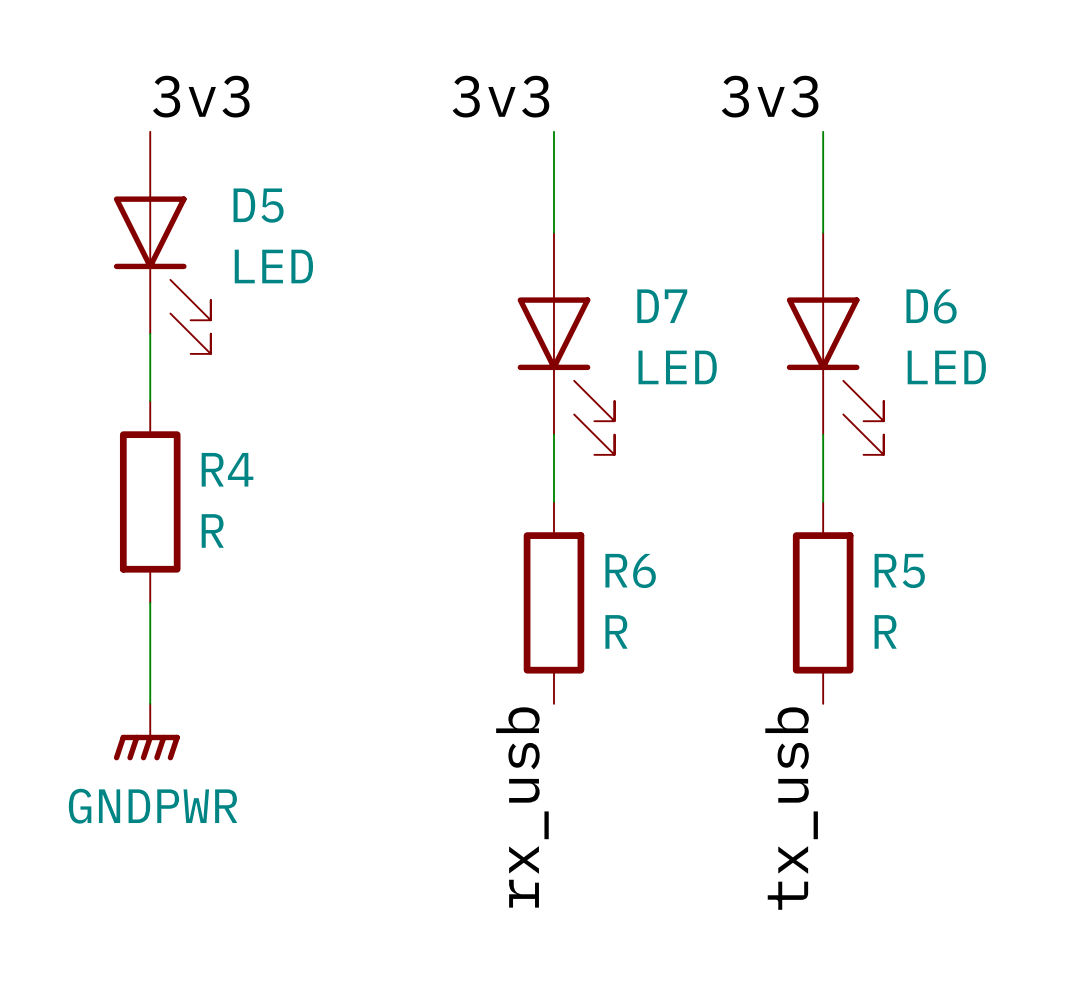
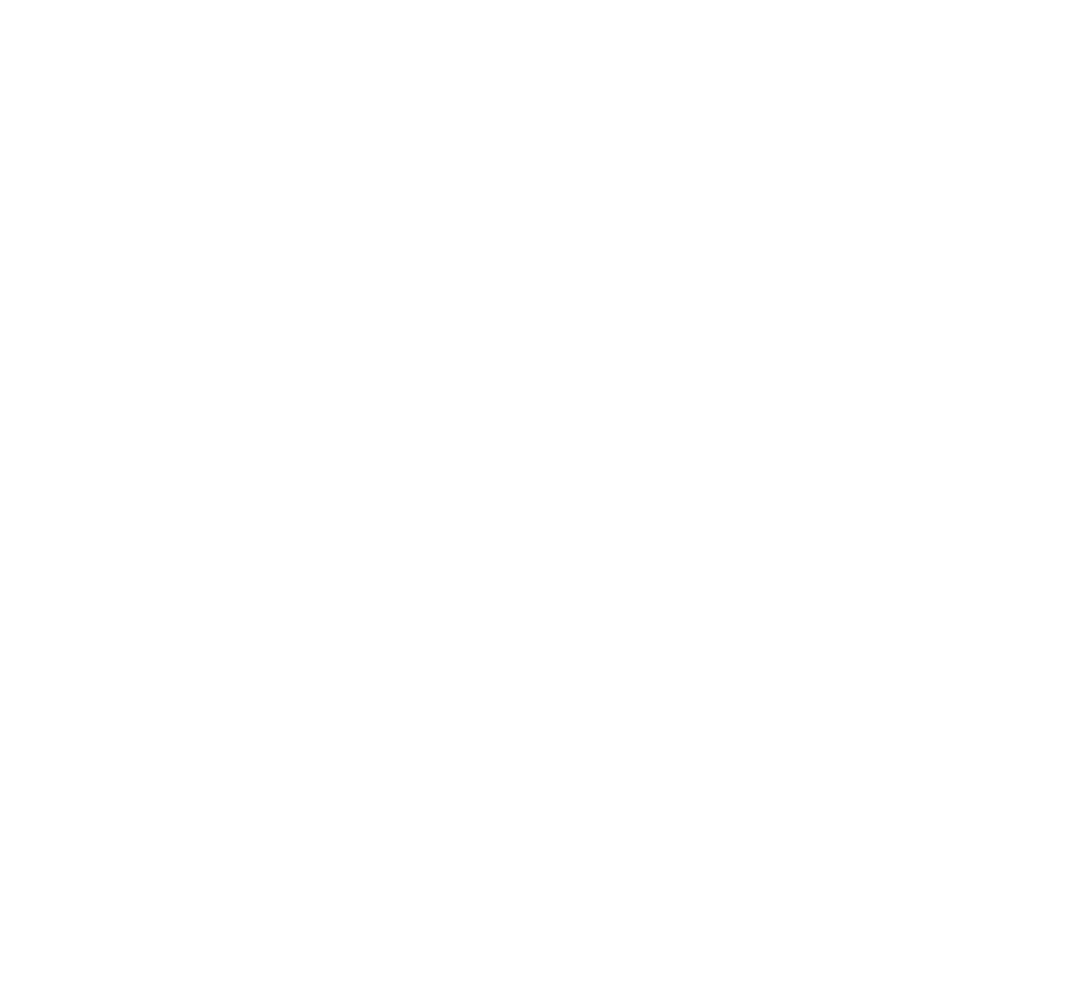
label: 3v3 (201, 96) -> none
label: 3v3 (500, 96) -> none
label: 3v3 (770, 96) -> none
wire: (553, 131) (553, 232) -> none
wire: (823, 131) (823, 232) -> none
D5: LED (162, 242) -> none
wire: (150, 333) (150, 401) -> none
D7: LED (566, 343) -> none
D6: LED (835, 343) -> none
wire: (553, 434) (553, 501) -> none
wire: (823, 434) (823, 501) -> none
R4: R (150, 501) -> none
wire: (150, 602) (150, 703) -> none
R6: R (553, 602) -> none
R5: R (823, 602) -> none
power symbol: GNDPWR (146, 732) -> none
label: rx_usb (522, 807) -> none
label: tx_usb (791, 808) -> none

